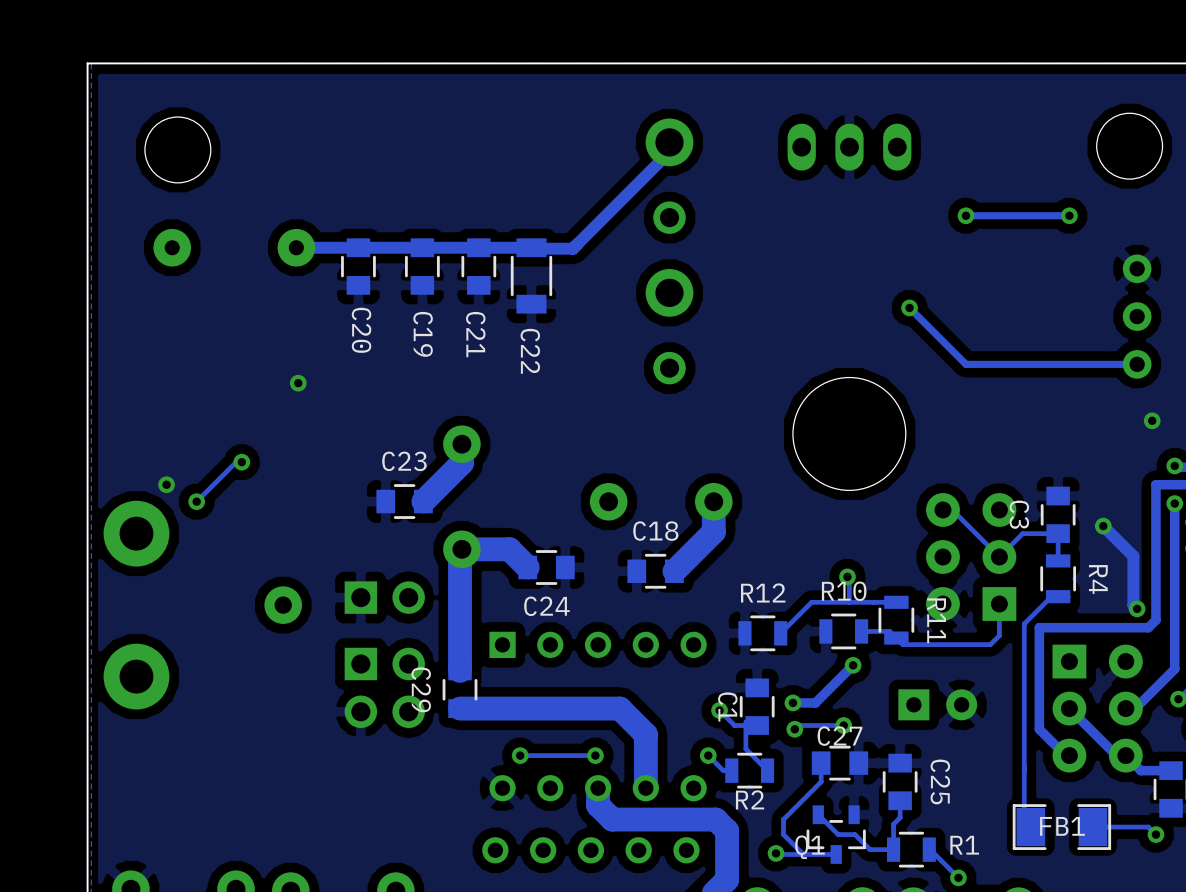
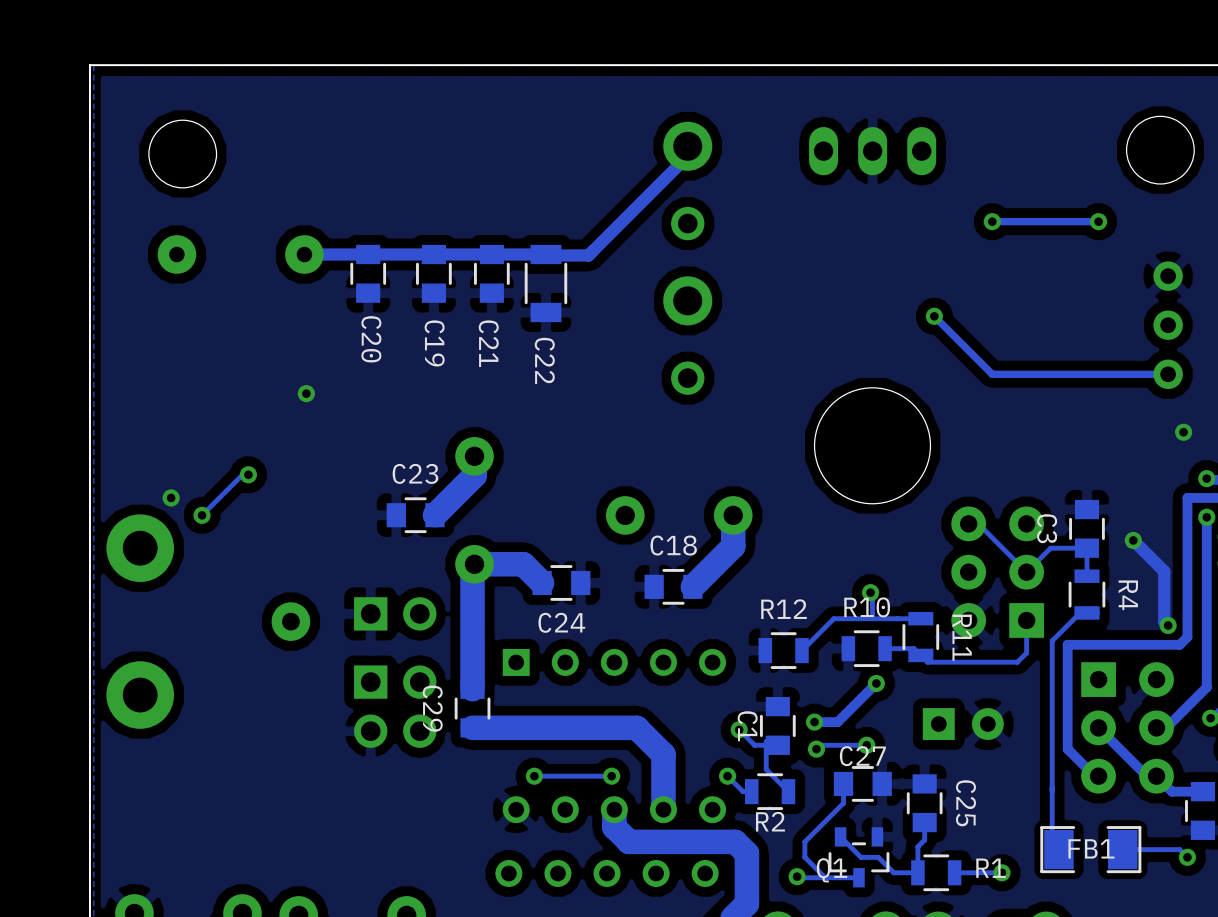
track: (930, 849) (958, 877) -> (955, 872) (1001, 872)
via position: (958, 877) -> (1001, 872)

